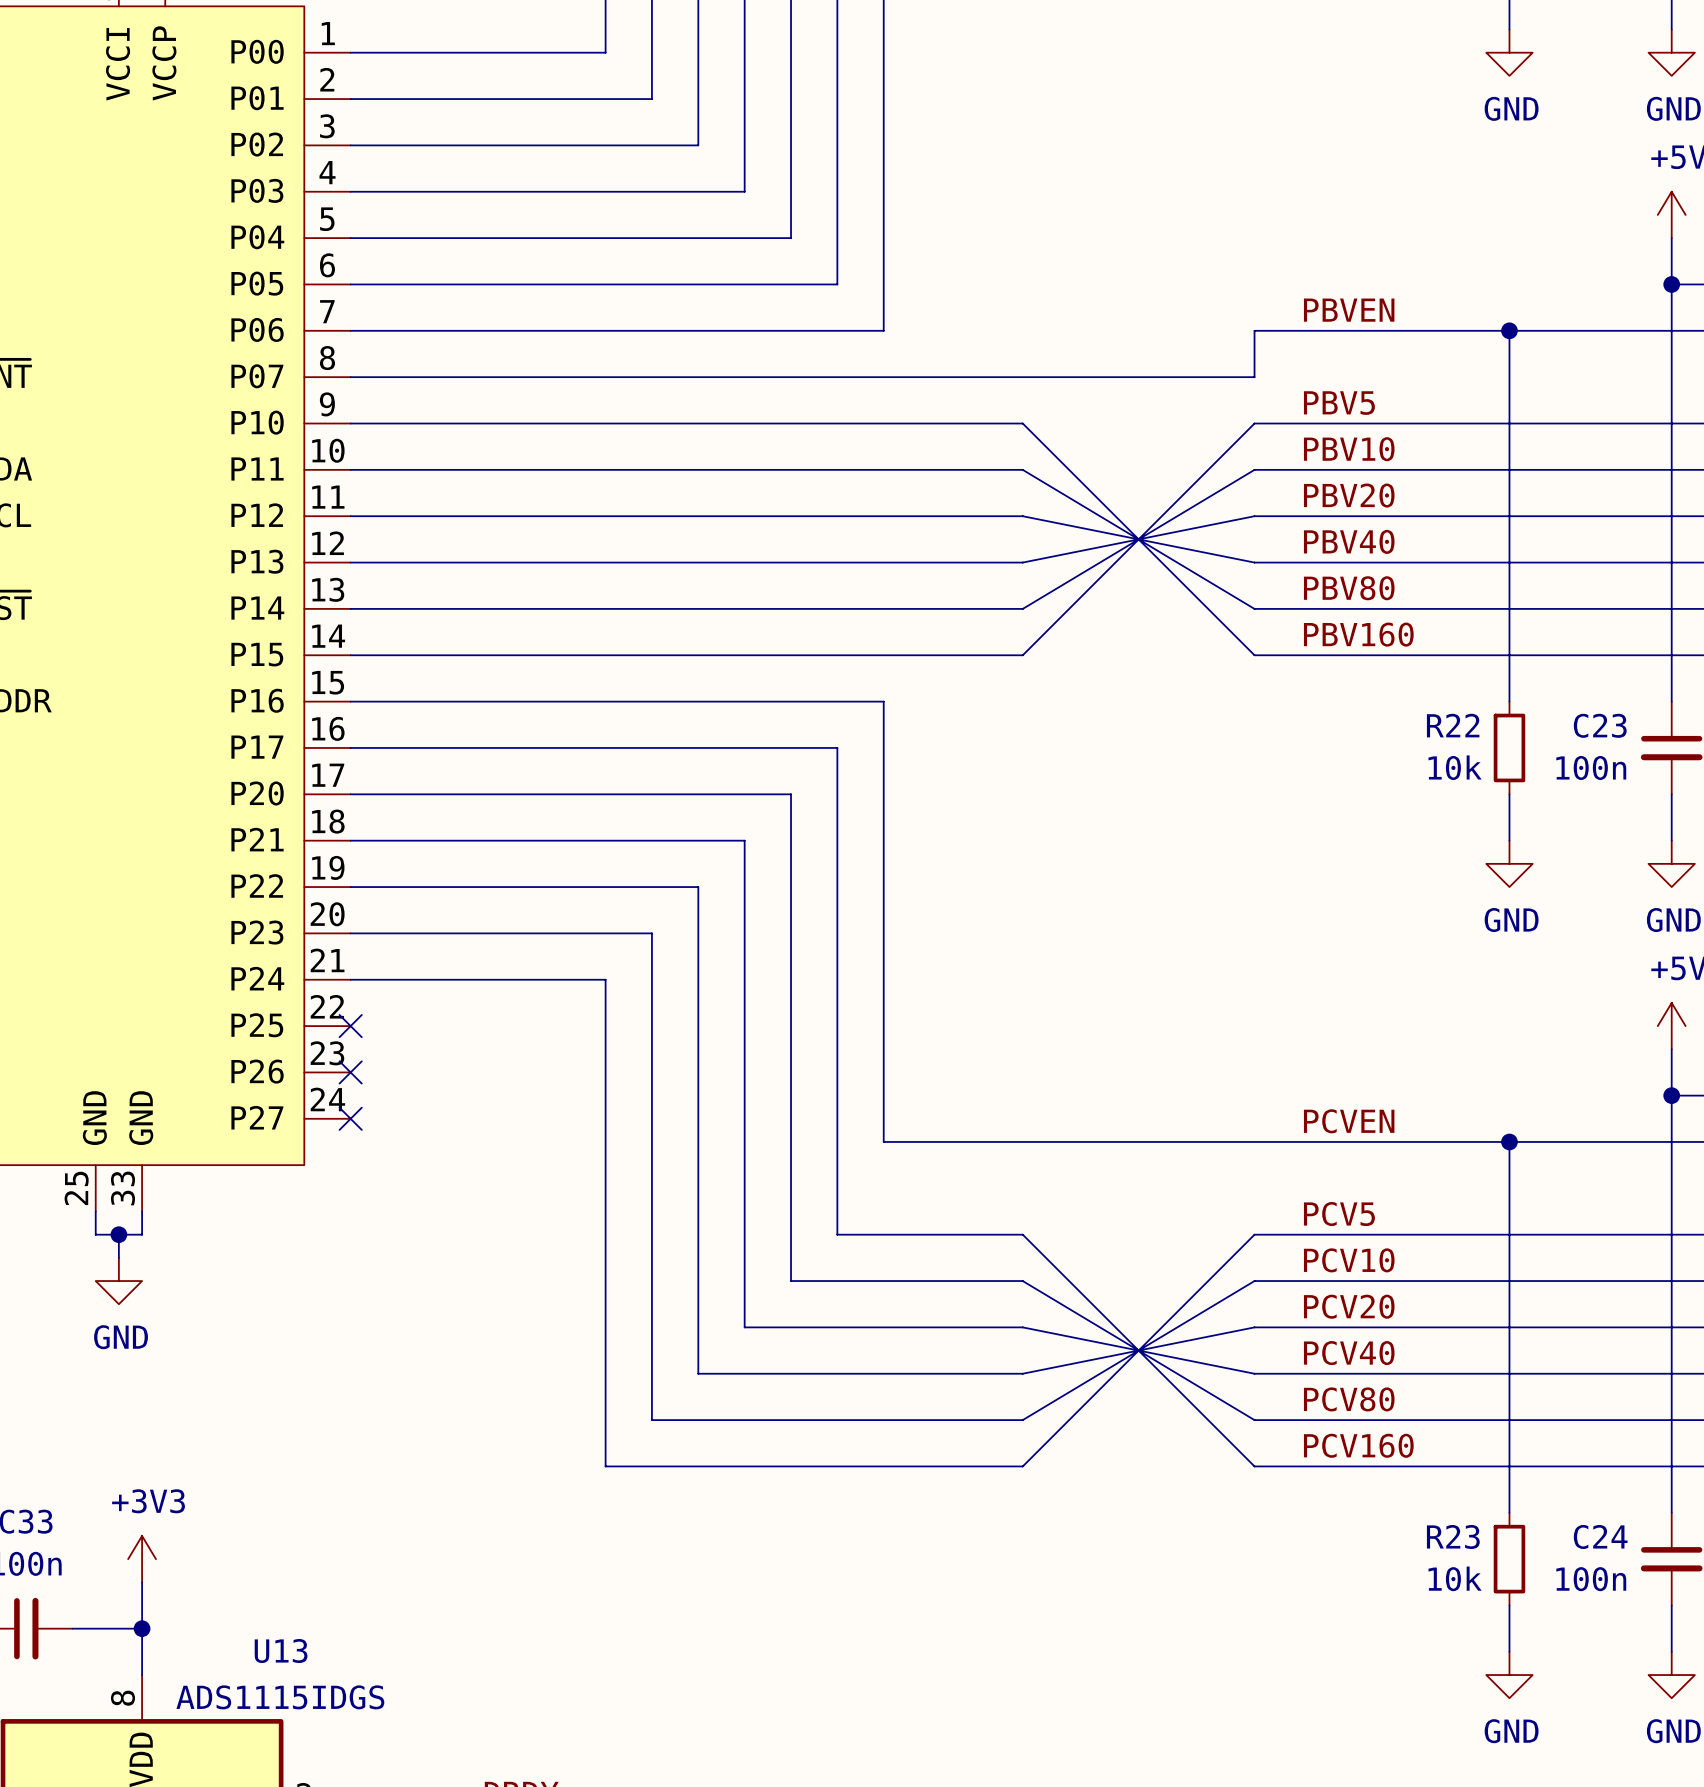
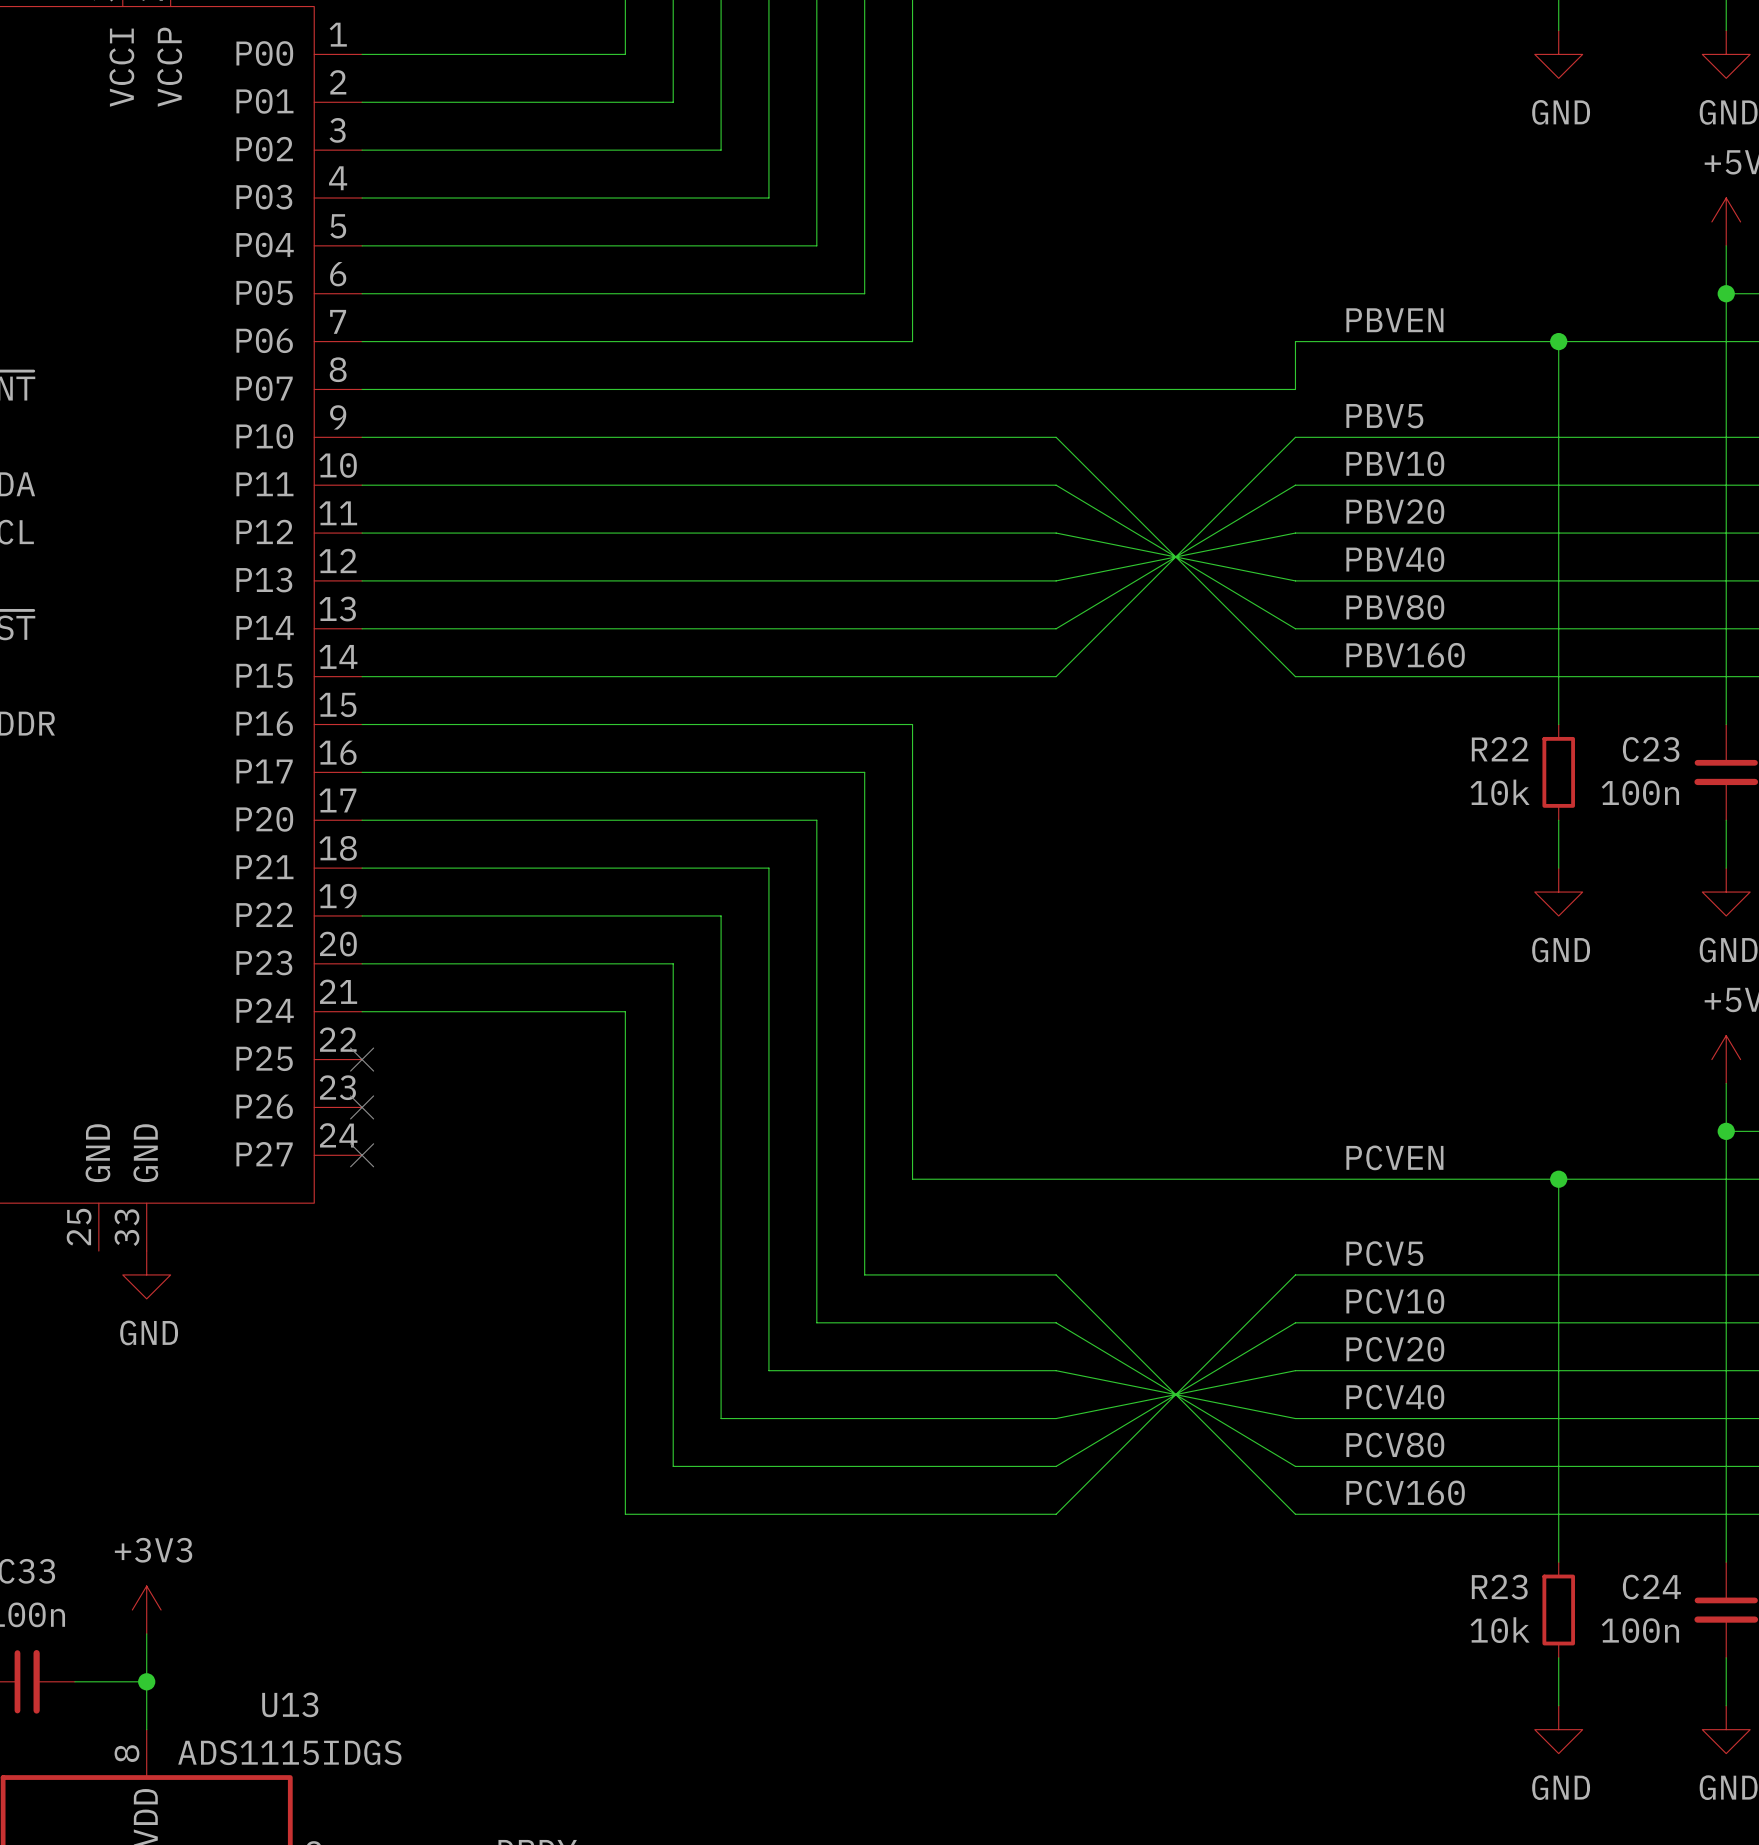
wire: (95, 1211) (95, 1234) (142, 1234) (142, 1211) -> none
wire: (118, 1234) (118, 1257) -> none
junction: (118, 1234) -> none
power symbol position: GND (118, 1281) -> GND (146, 1274)

